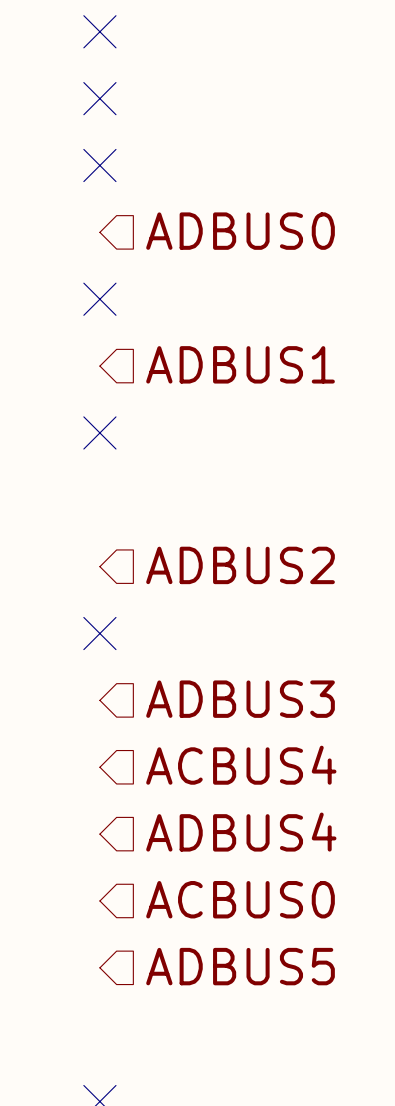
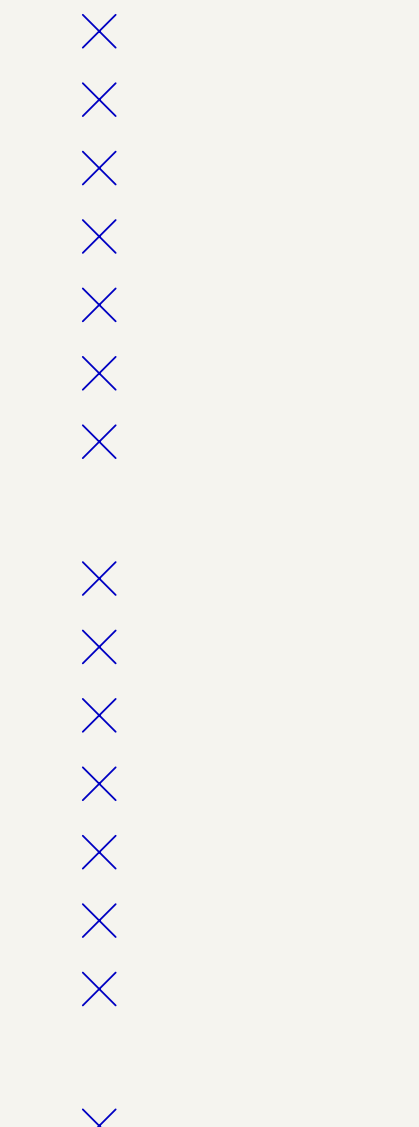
hierarchical label: ADBUS0 (240, 231) -> none
no-connect mark: none -> (99, 236)
hierarchical label: ADBUS1 (240, 364) -> none
no-connect mark: none -> (99, 373)
hierarchical label: ADBUS2 (240, 565) -> none
no-connect mark: none -> (99, 578)
hierarchical label: ADBUS3 (240, 699) -> none
no-connect mark: none -> (99, 715)
hierarchical label: ACBUS4 (241, 765) -> none
no-connect mark: none -> (99, 783)
hierarchical label: ADBUS4 (241, 832) -> none
no-connect mark: none -> (99, 852)
hierarchical label: ACBUS0 (240, 899) -> none
no-connect mark: none -> (99, 920)
hierarchical label: ADBUS5 (240, 966) -> none
no-connect mark: none -> (99, 989)

